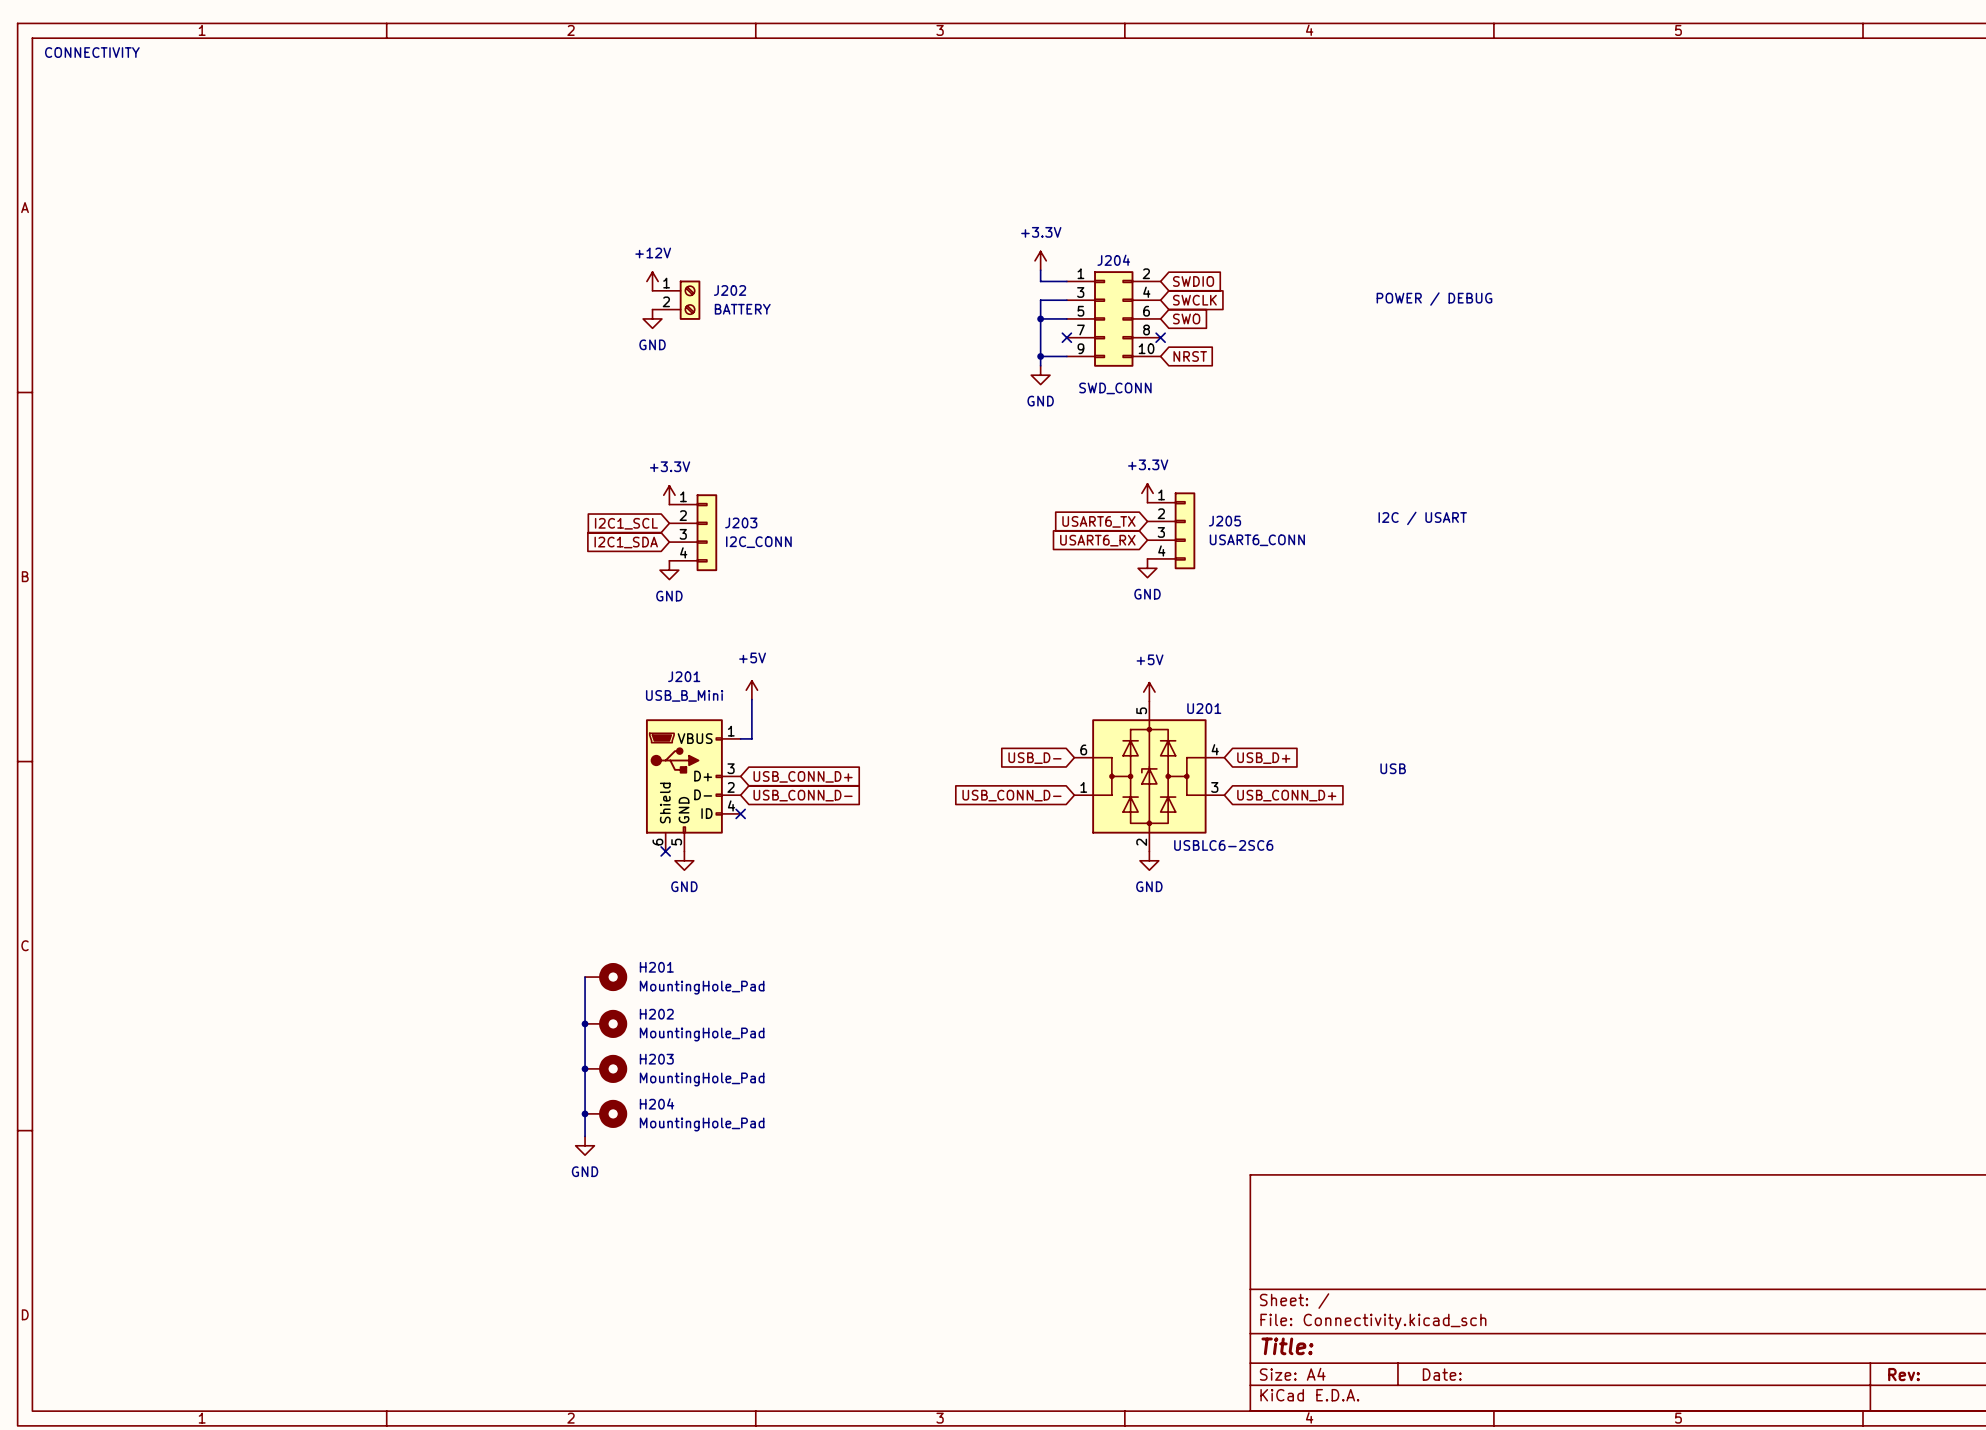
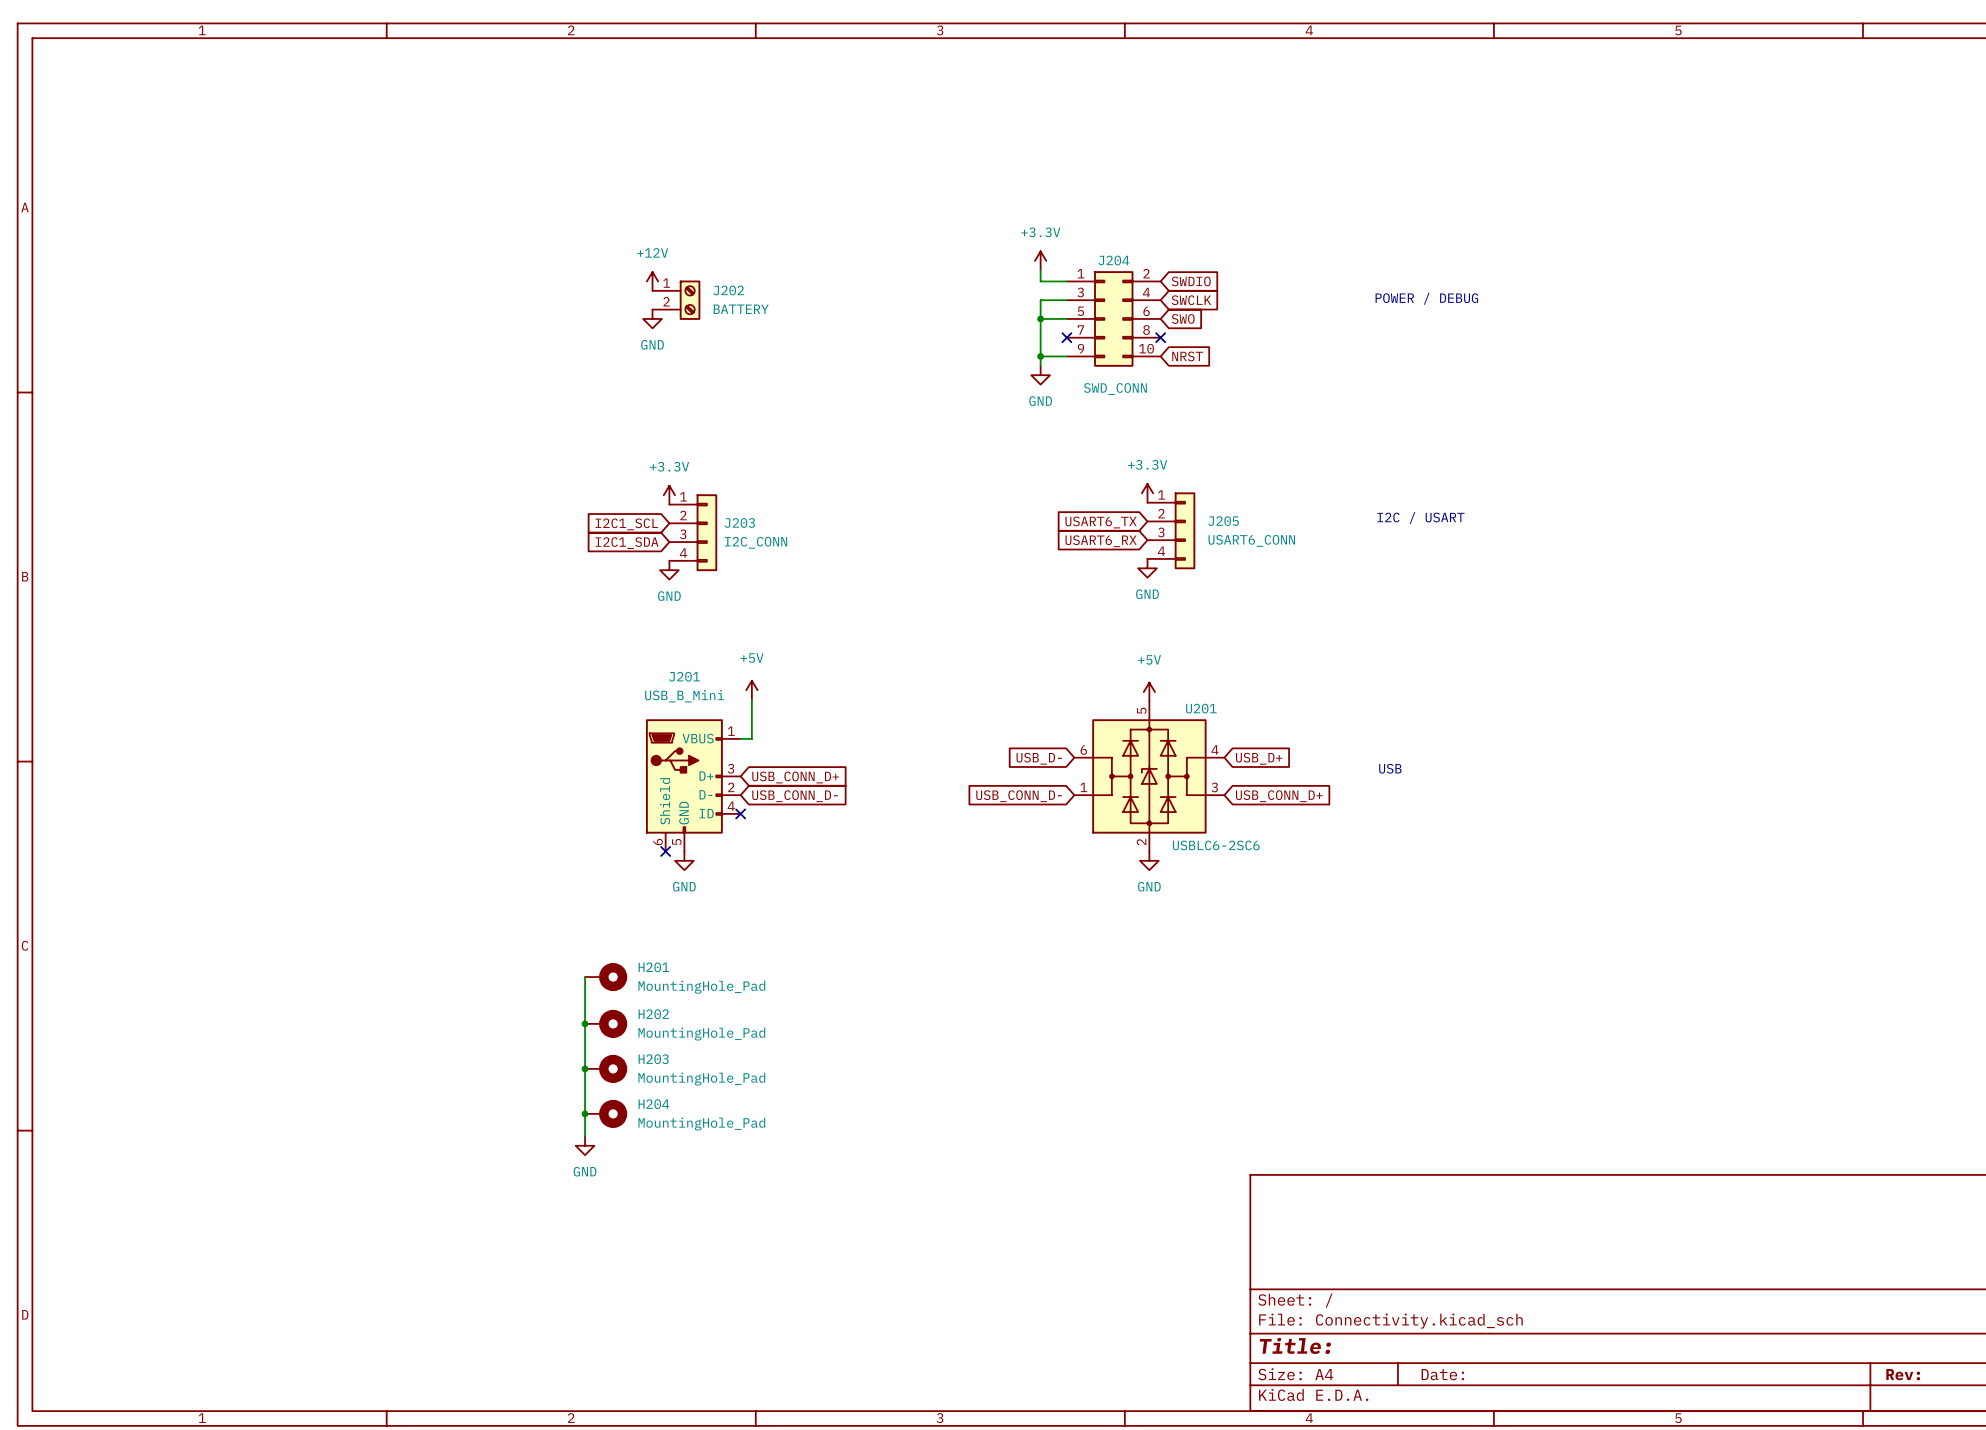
text: CONNECTIVITY (92, 52) -> none

